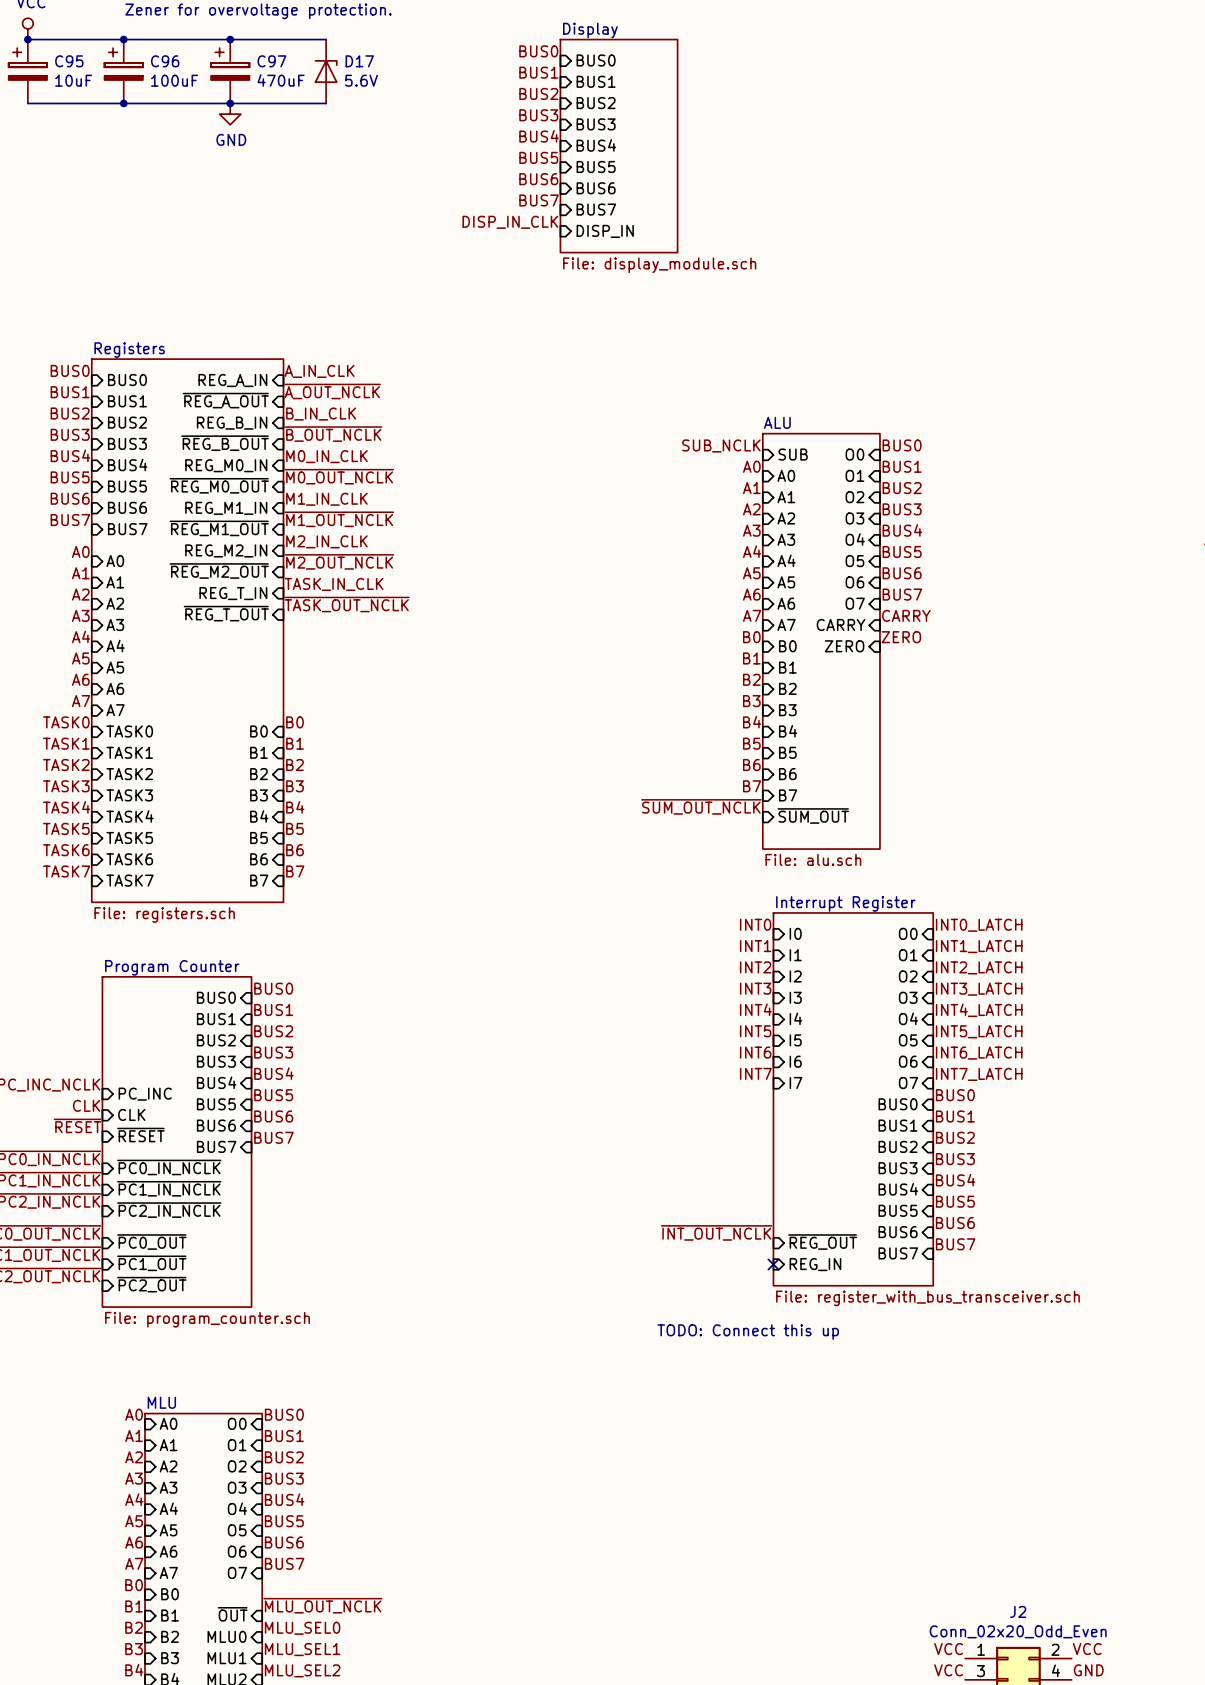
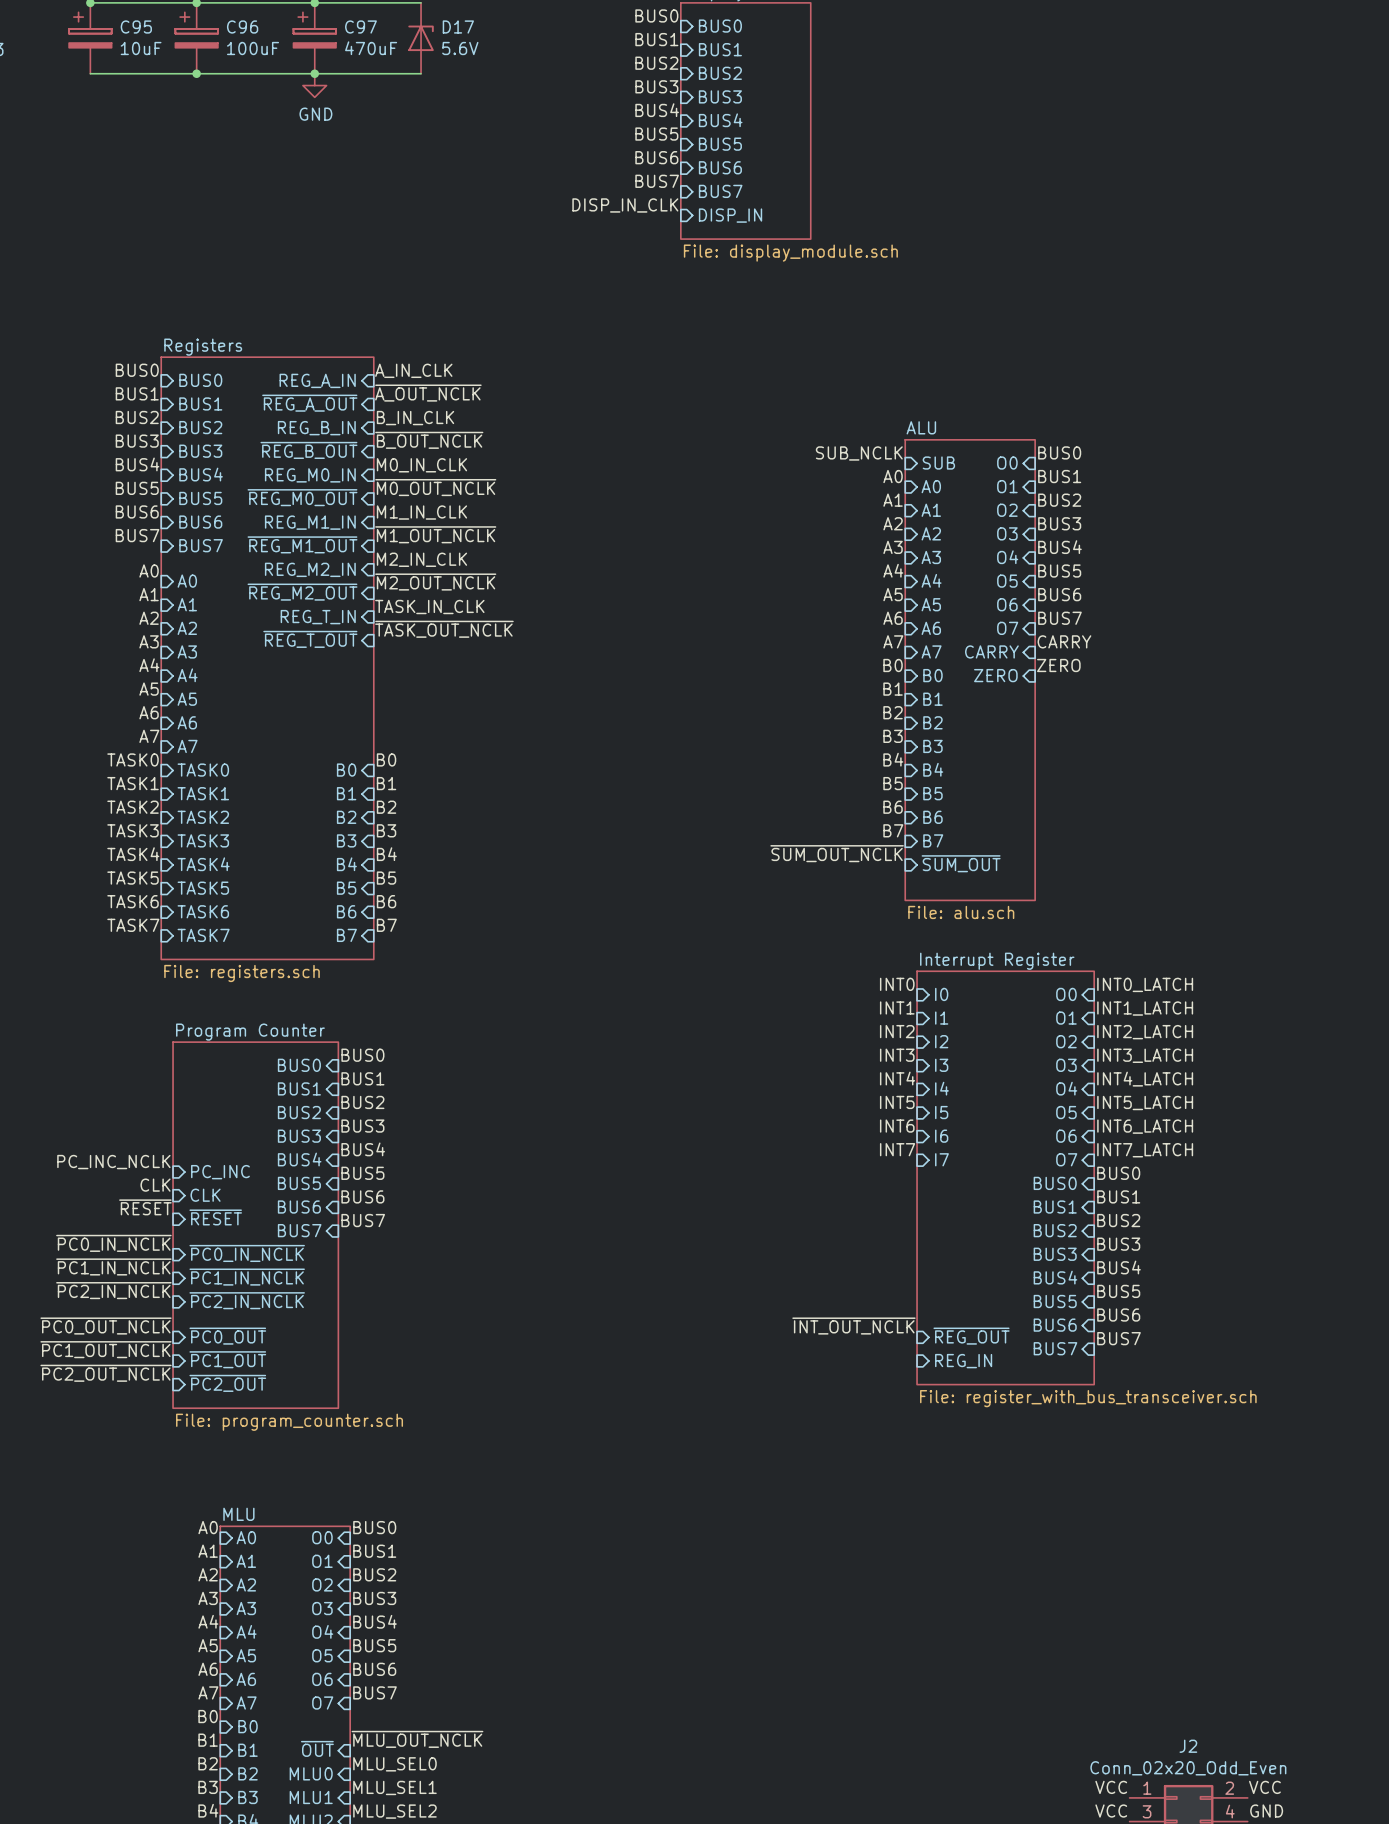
no-connect mark: (773, 1264) -> none
text: TODO: Connect this up (748, 1332) -> none

